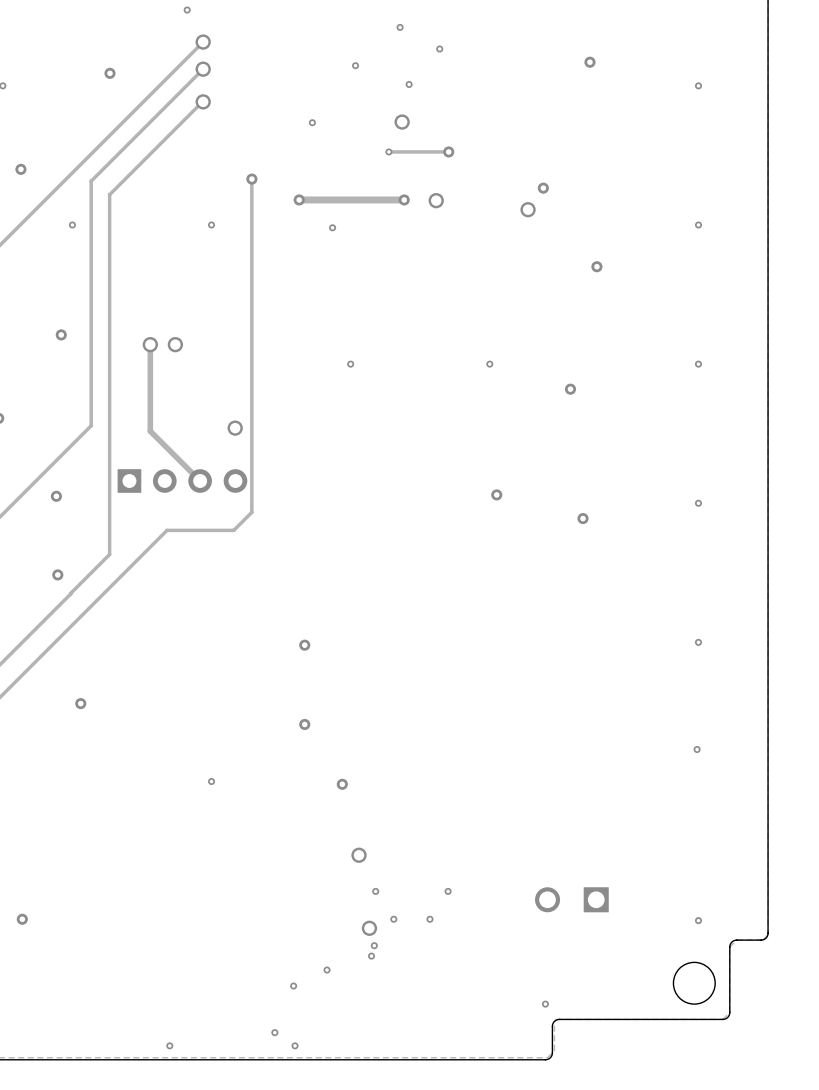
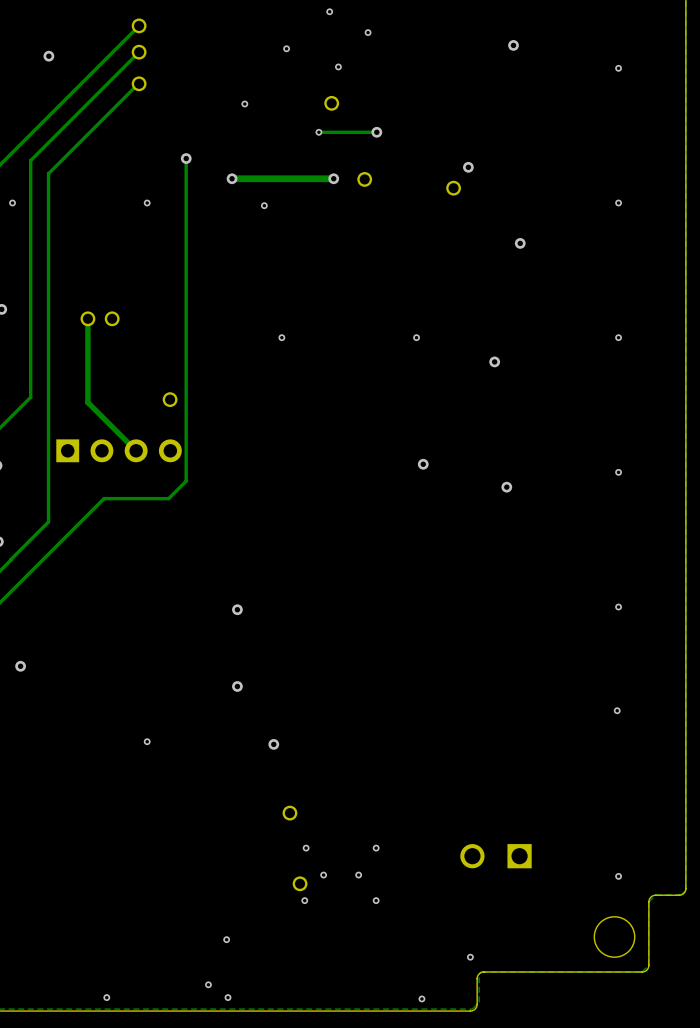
via: none -> (376, 900)
via: (371, 956) -> none
via: (327, 970) -> none
via: none -> (421, 998)

